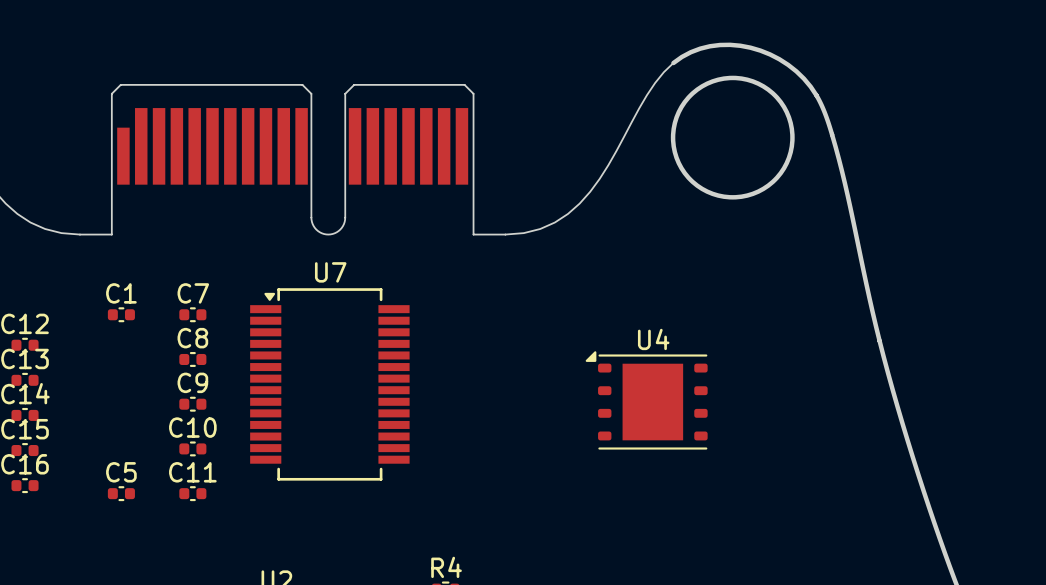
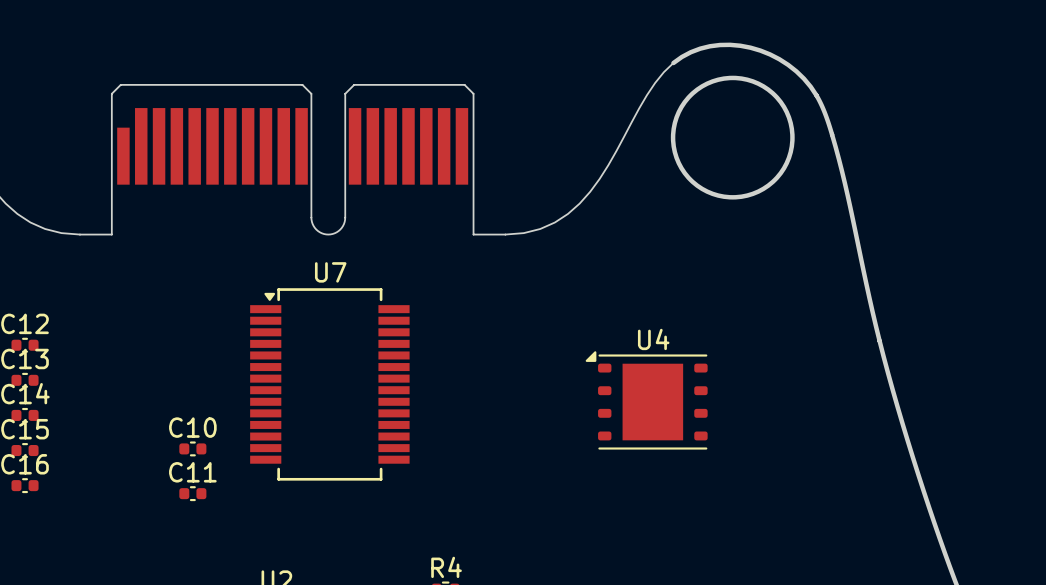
C1: (121, 314) -> none
C7: (192, 314) -> none
C8: (192, 359) -> none
C9: (192, 404) -> none
C5: (121, 493) -> none

